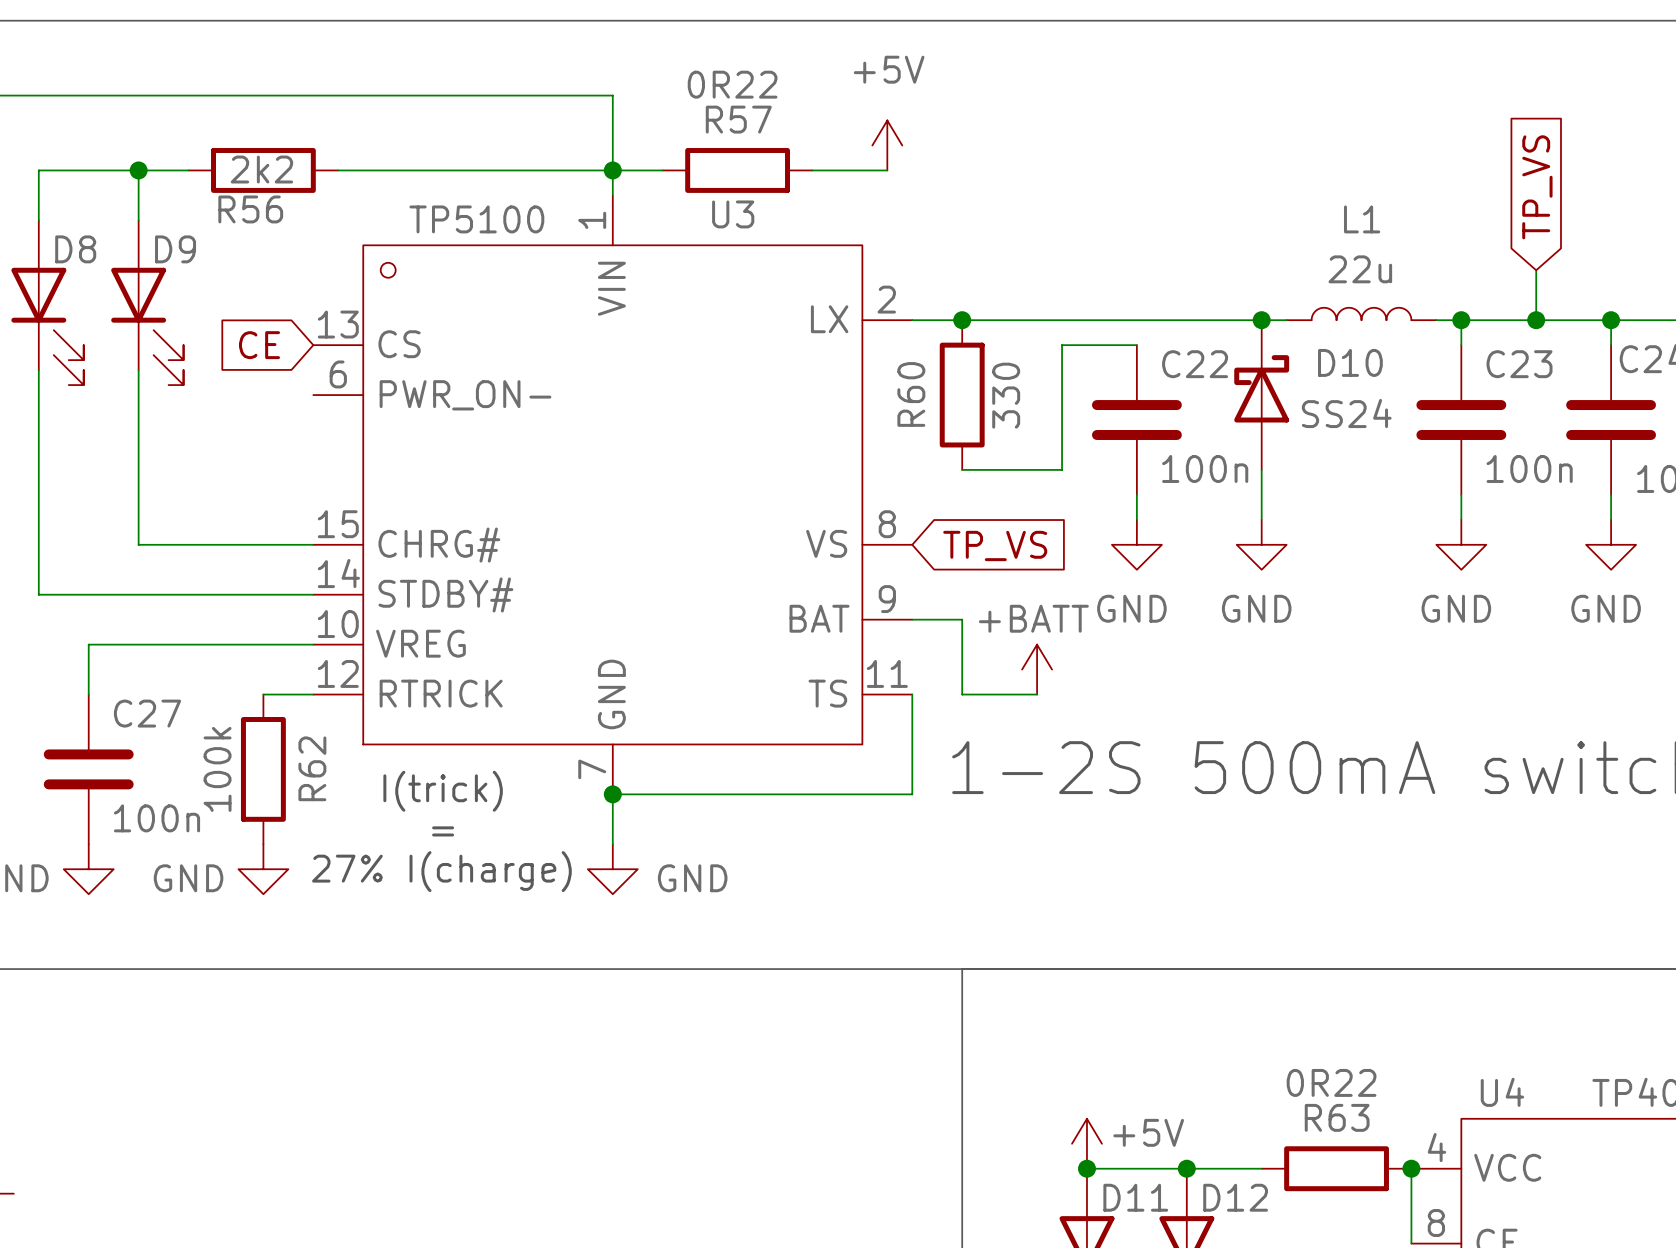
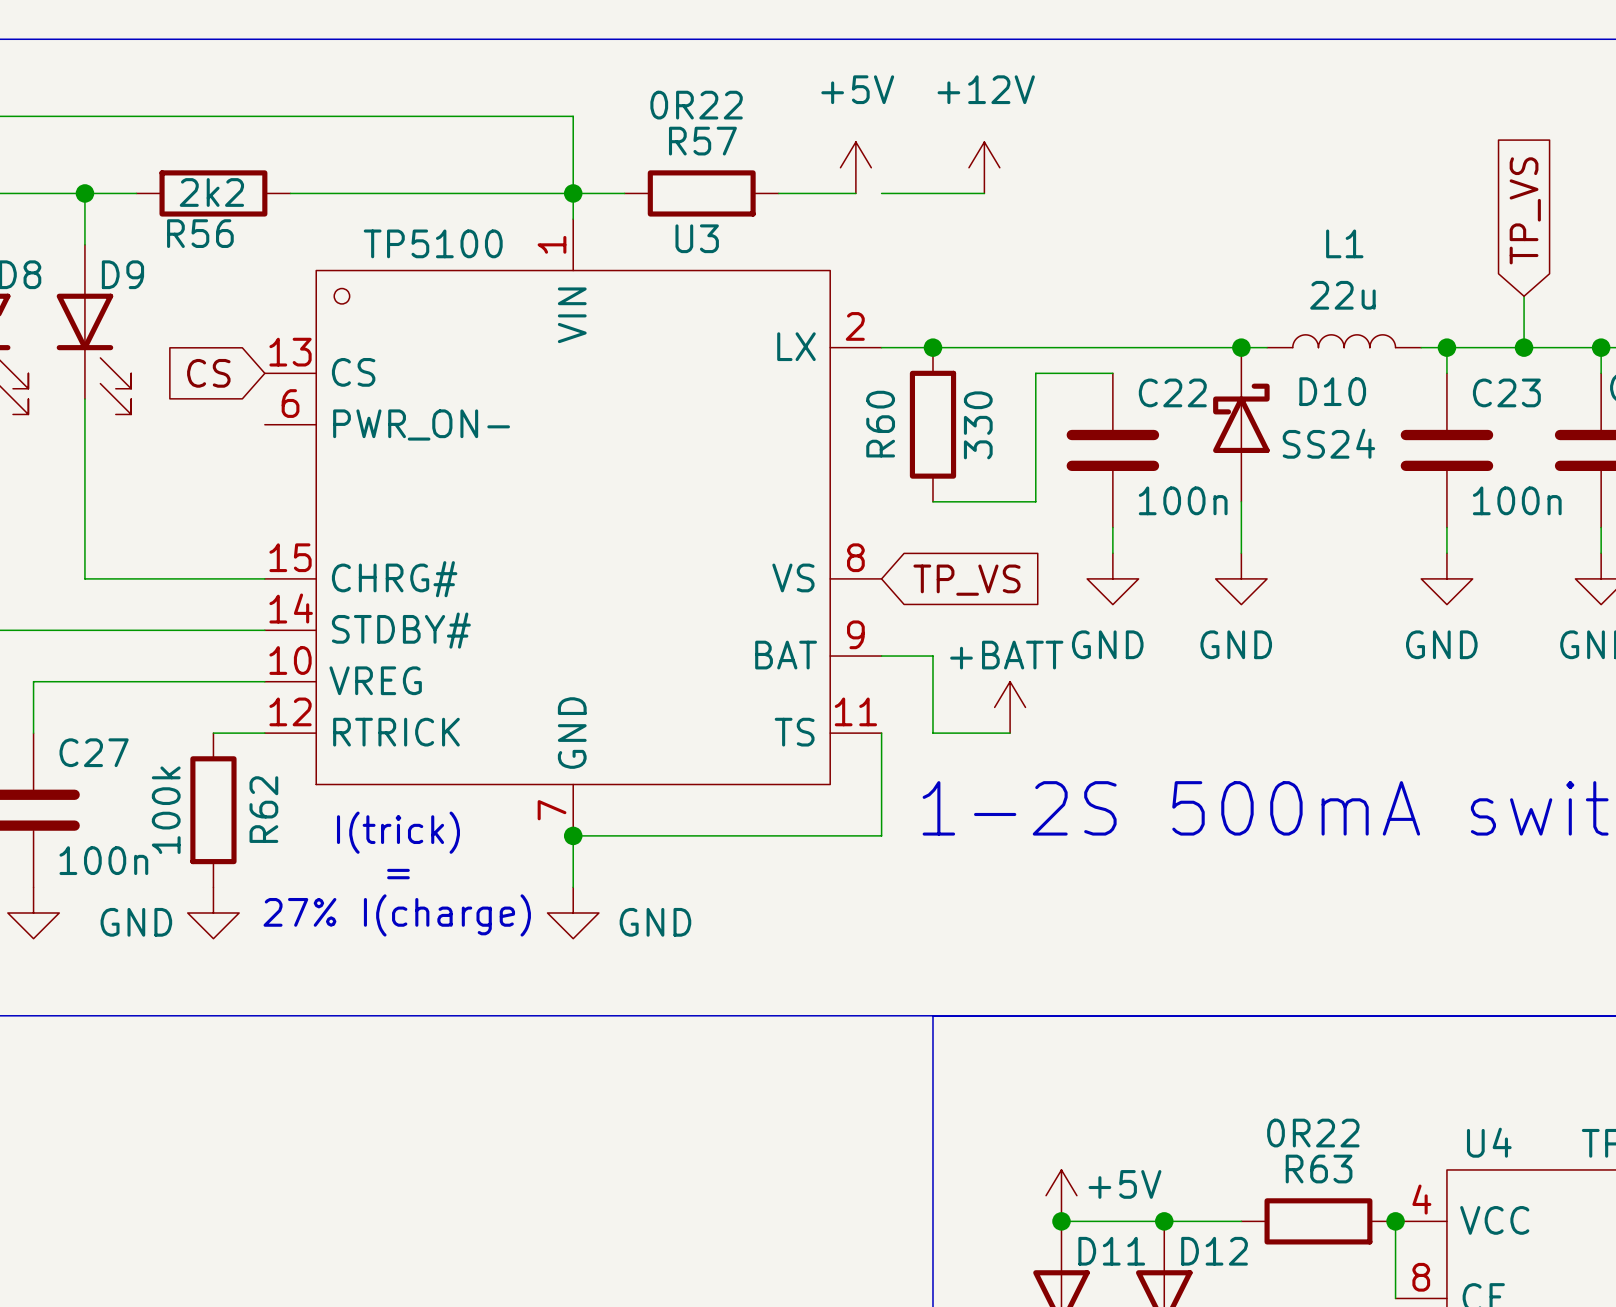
power symbol: none -> +12V (984, 167)
wire: none -> (881, 193) (984, 193)
global label: CE (259, 345) -> CS (208, 373)

